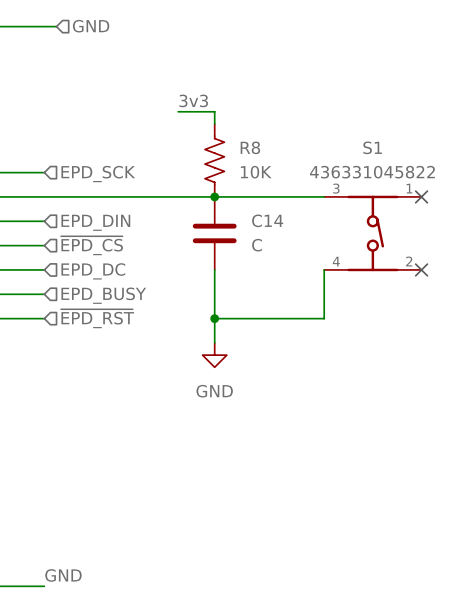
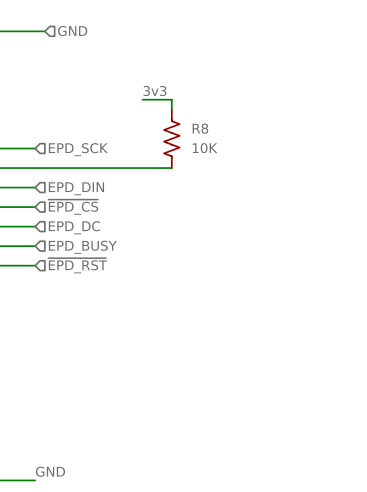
wire: (214, 196) (324, 196) -> none
junction: (214, 196) -> none
no-connect mark: (421, 196) -> none
C14: C (214, 233) -> none
S1: 436331045822 (372, 233) -> none
wire: (214, 269) (214, 342) -> none
wire: (324, 269) (324, 318) (214, 318) -> none
no-connect mark: (421, 269) -> none
junction: (214, 318) -> none
power symbol: GND (214, 355) -> none

